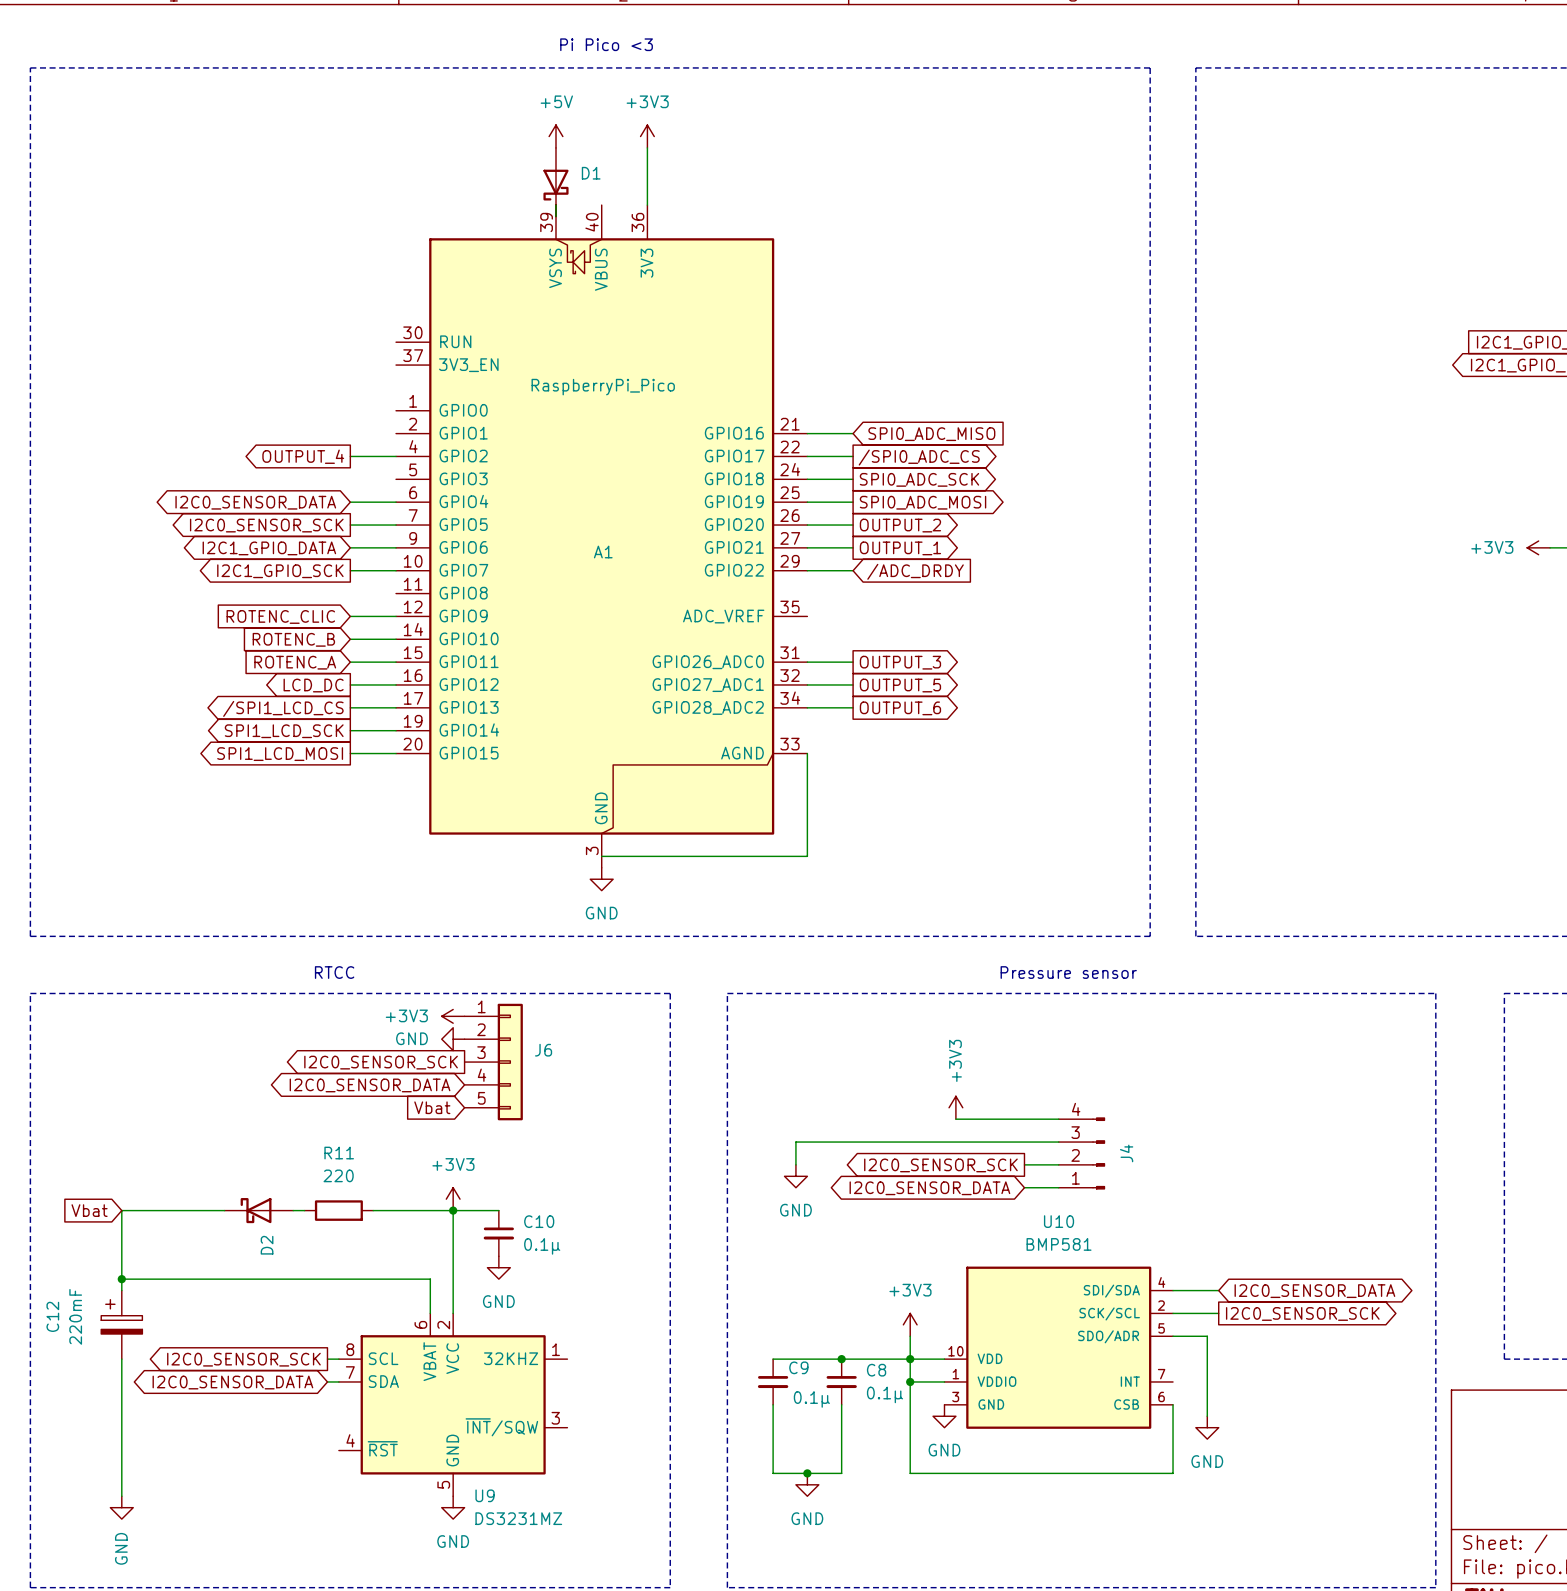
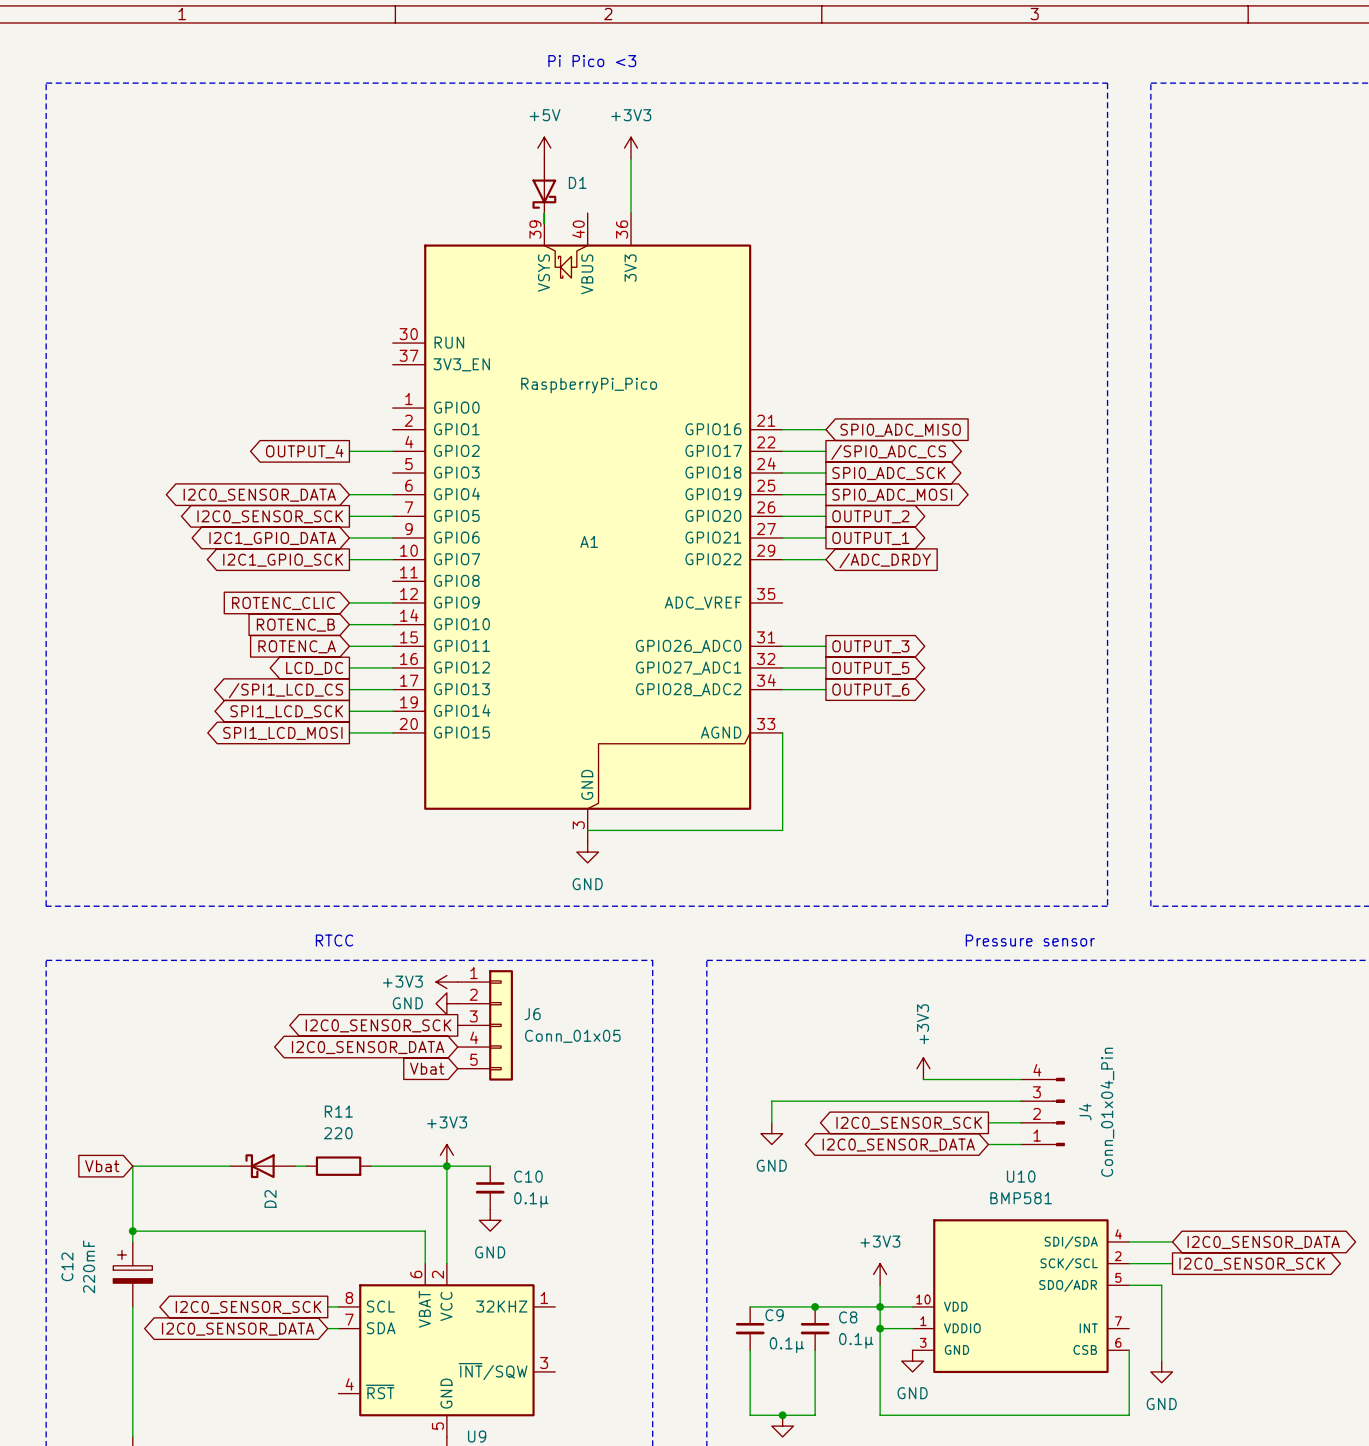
J6 value: none -> Conn_01x05 (572, 1036)
J4 value: none -> Conn_01x04_Pin (1107, 1112)

